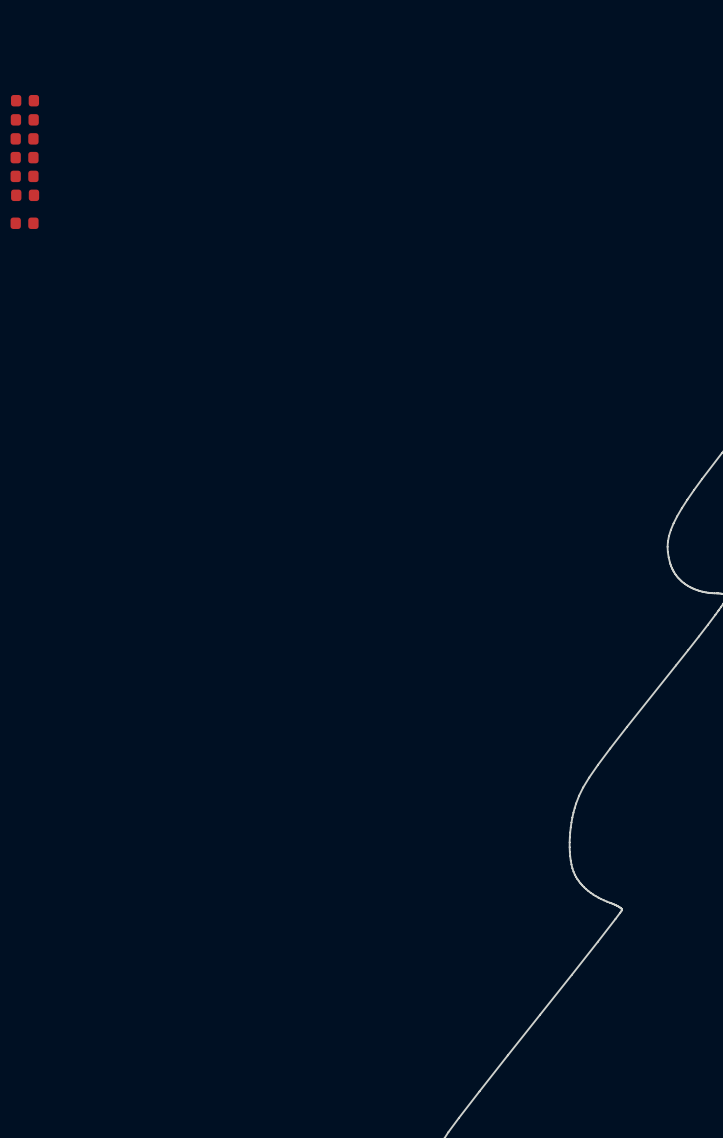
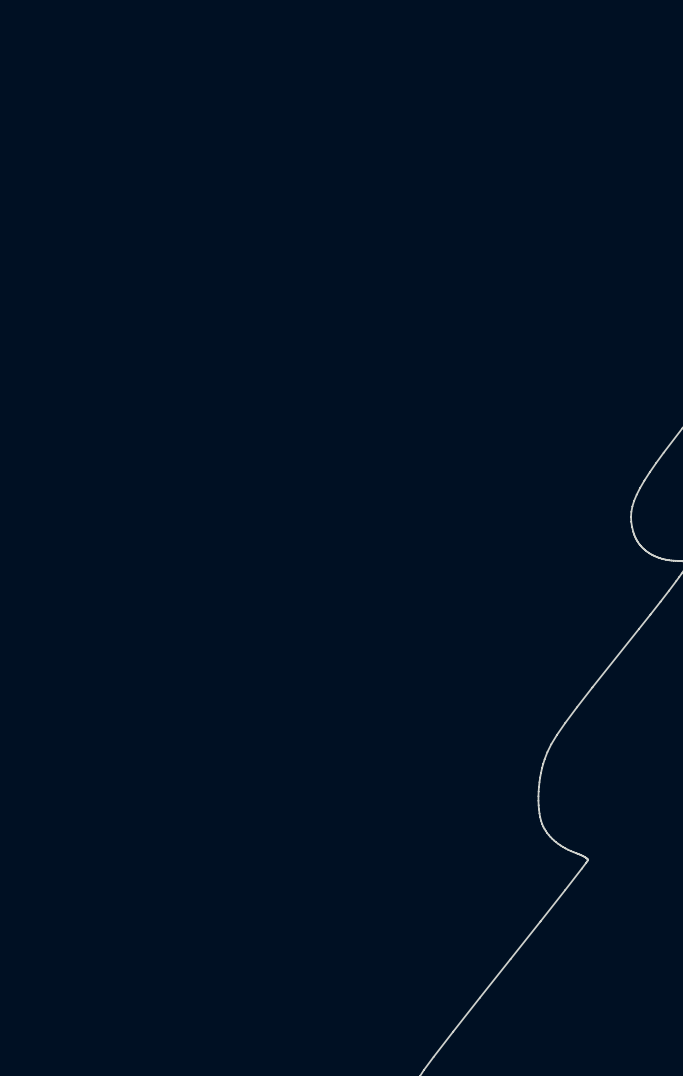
part: (25, 100) -> none
part: (24, 119) -> none
part: (24, 138) -> none
part: (24, 157) -> none
part: (24, 176) -> none
part: (25, 195) -> none
part: (24, 223) -> none

